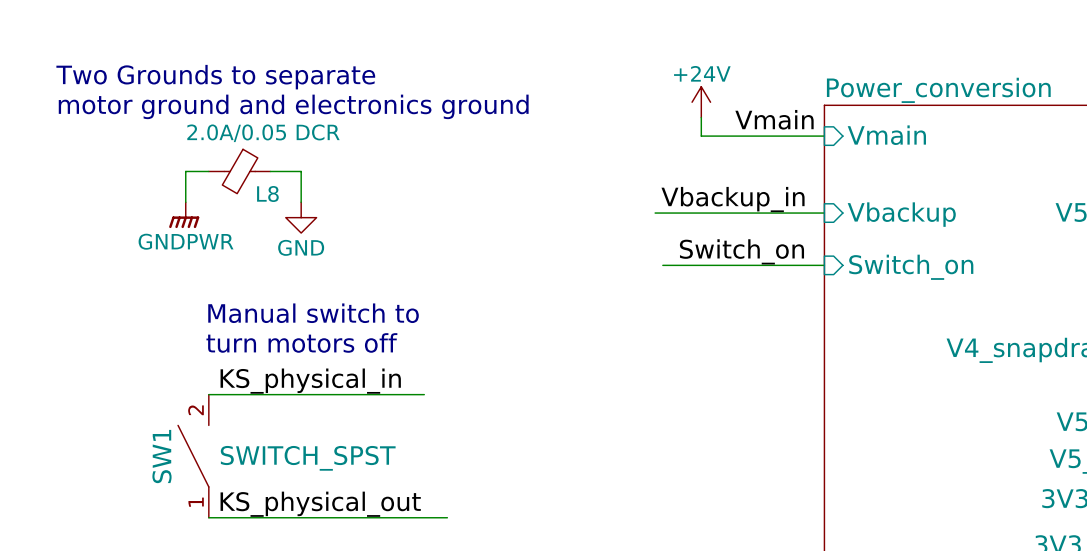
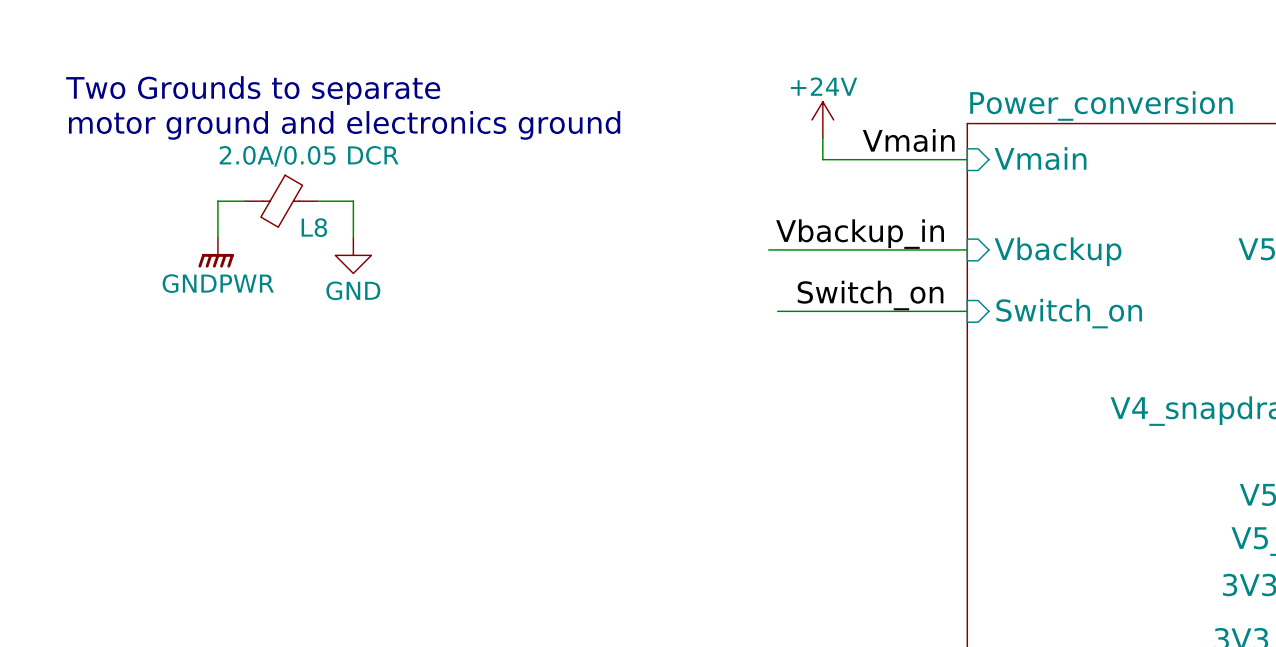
text: Manual switch to (313, 313) -> none
text: turn motors off (301, 342) -> none
label: KS_physical_in (310, 381) -> none
wire: (208, 394) (424, 394) -> none
SW1: SWITCH_SPST (193, 456) -> none
label: KS_physical_out (320, 504) -> none
wire: (208, 517) (447, 517) -> none

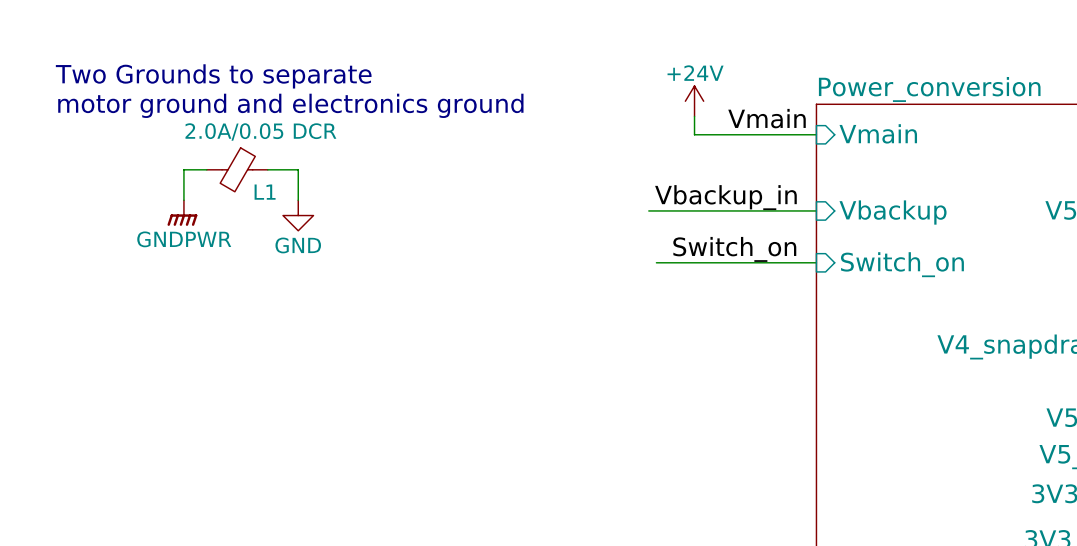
L8 name: L8 (314, 227) -> L1 (265, 192)

